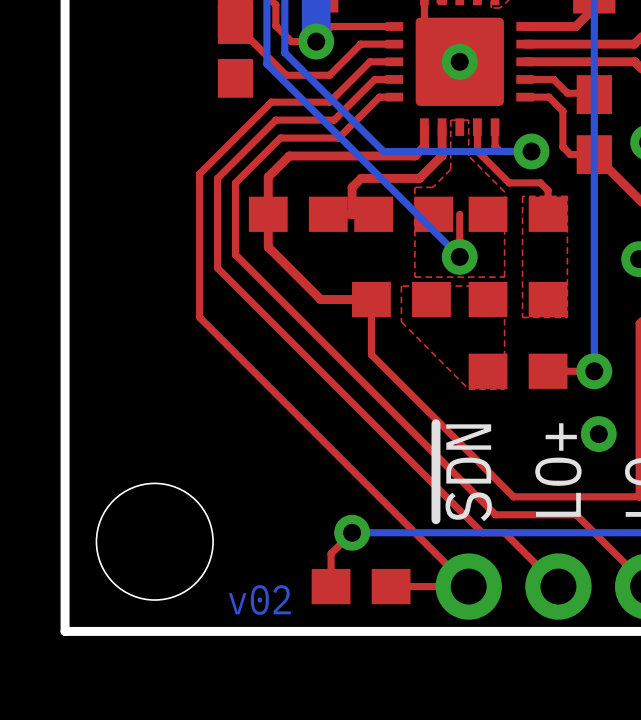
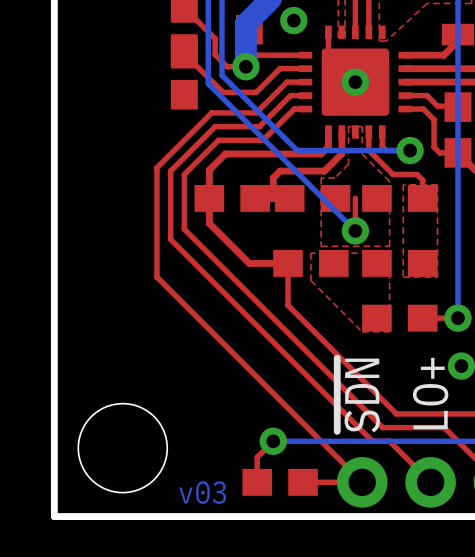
text: v02 (259, 600) -> v03 (202, 492)

